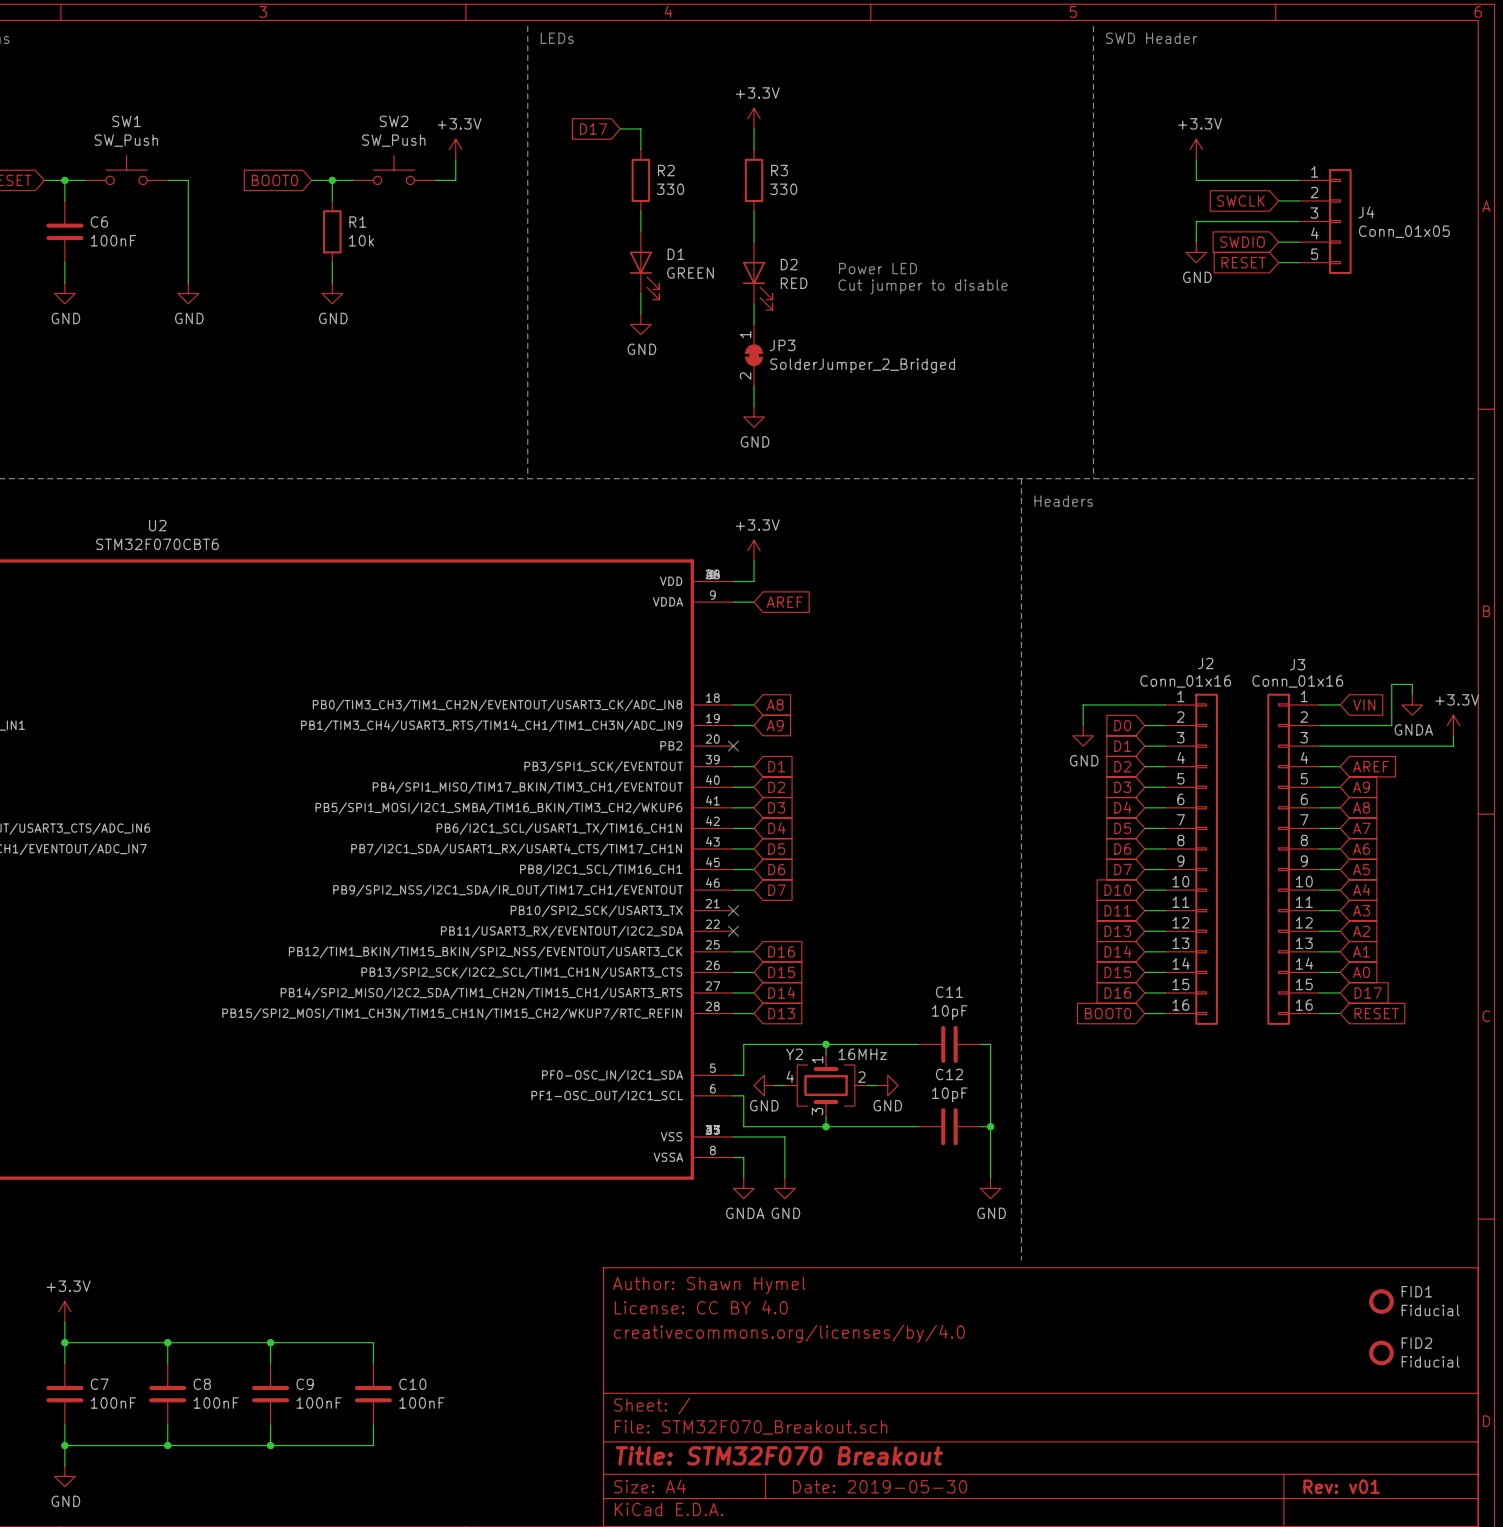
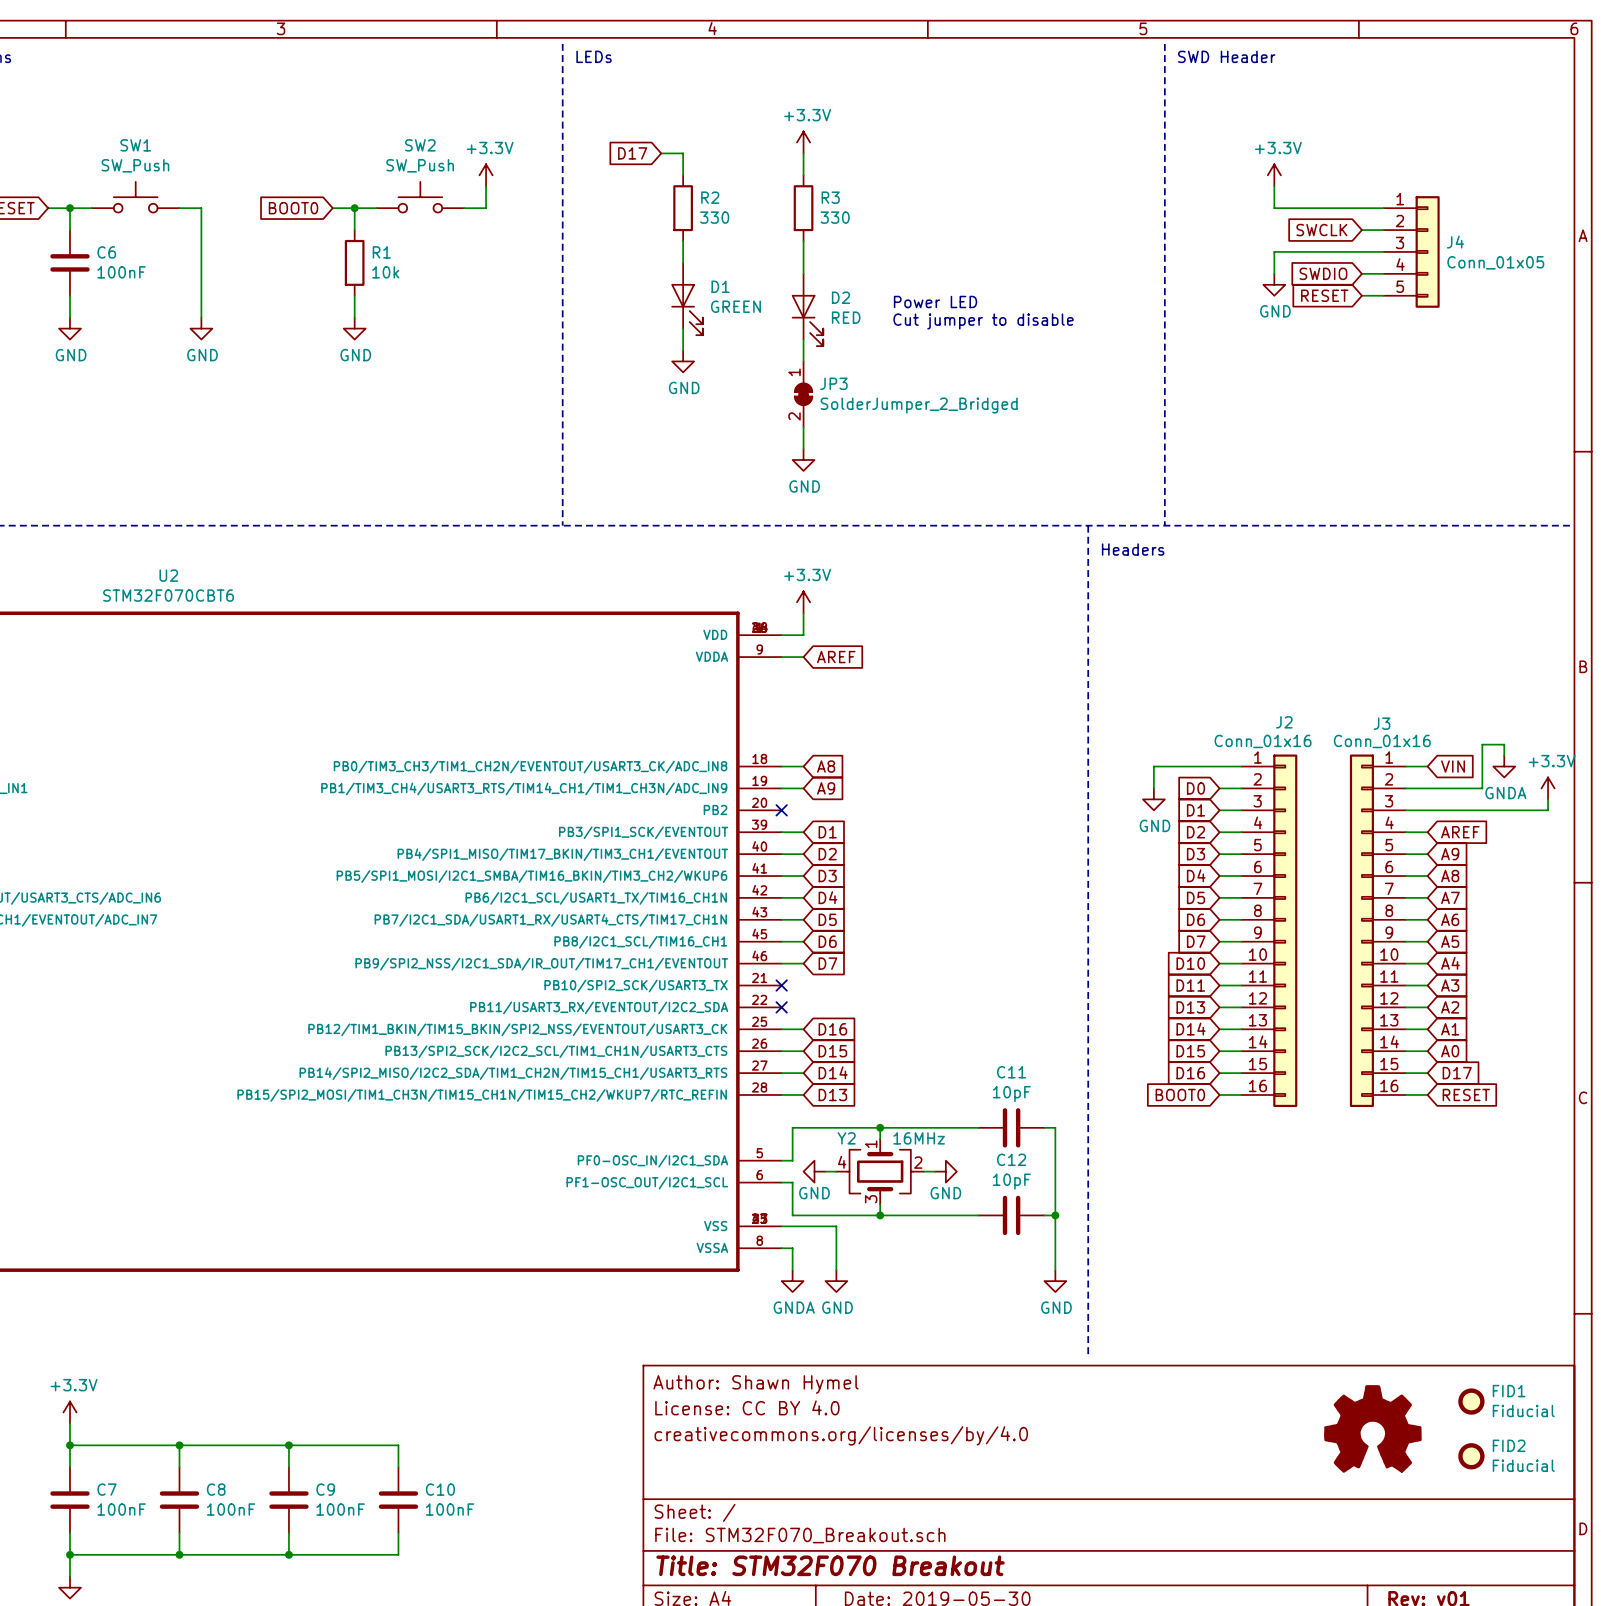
power symbol: none -> (1372, 1428)

